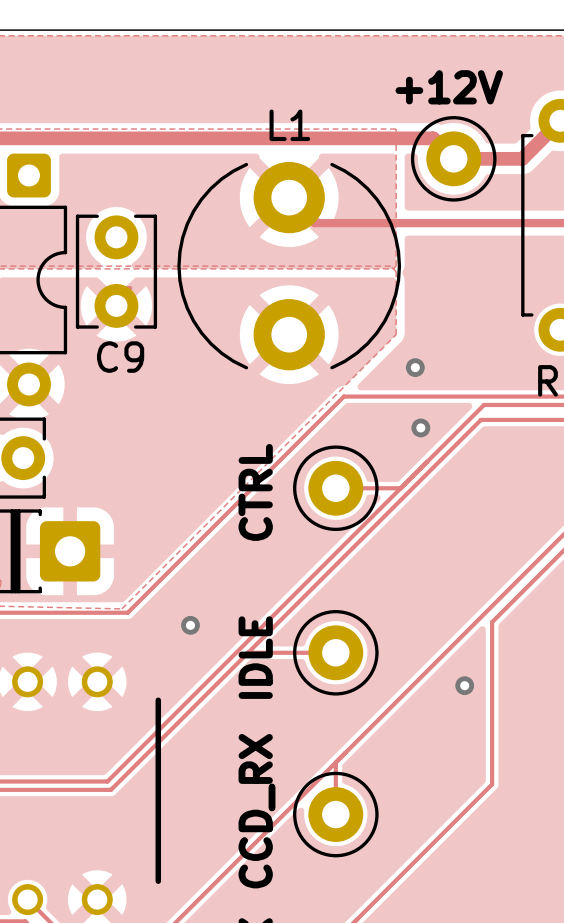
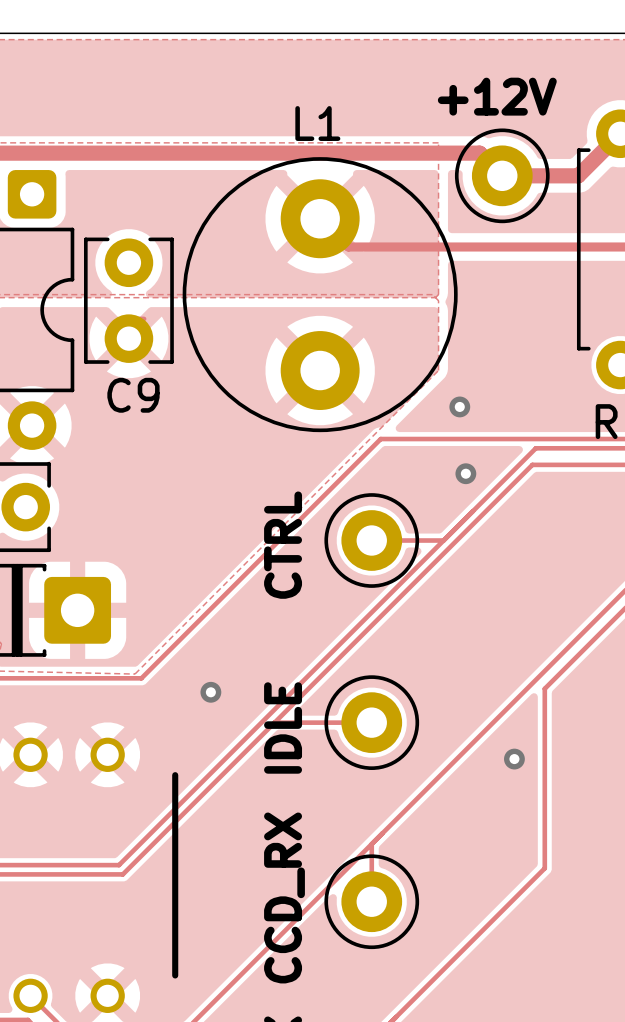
L1 footprint: [177, 161, 402, 371] -> [182, 157, 458, 433]

